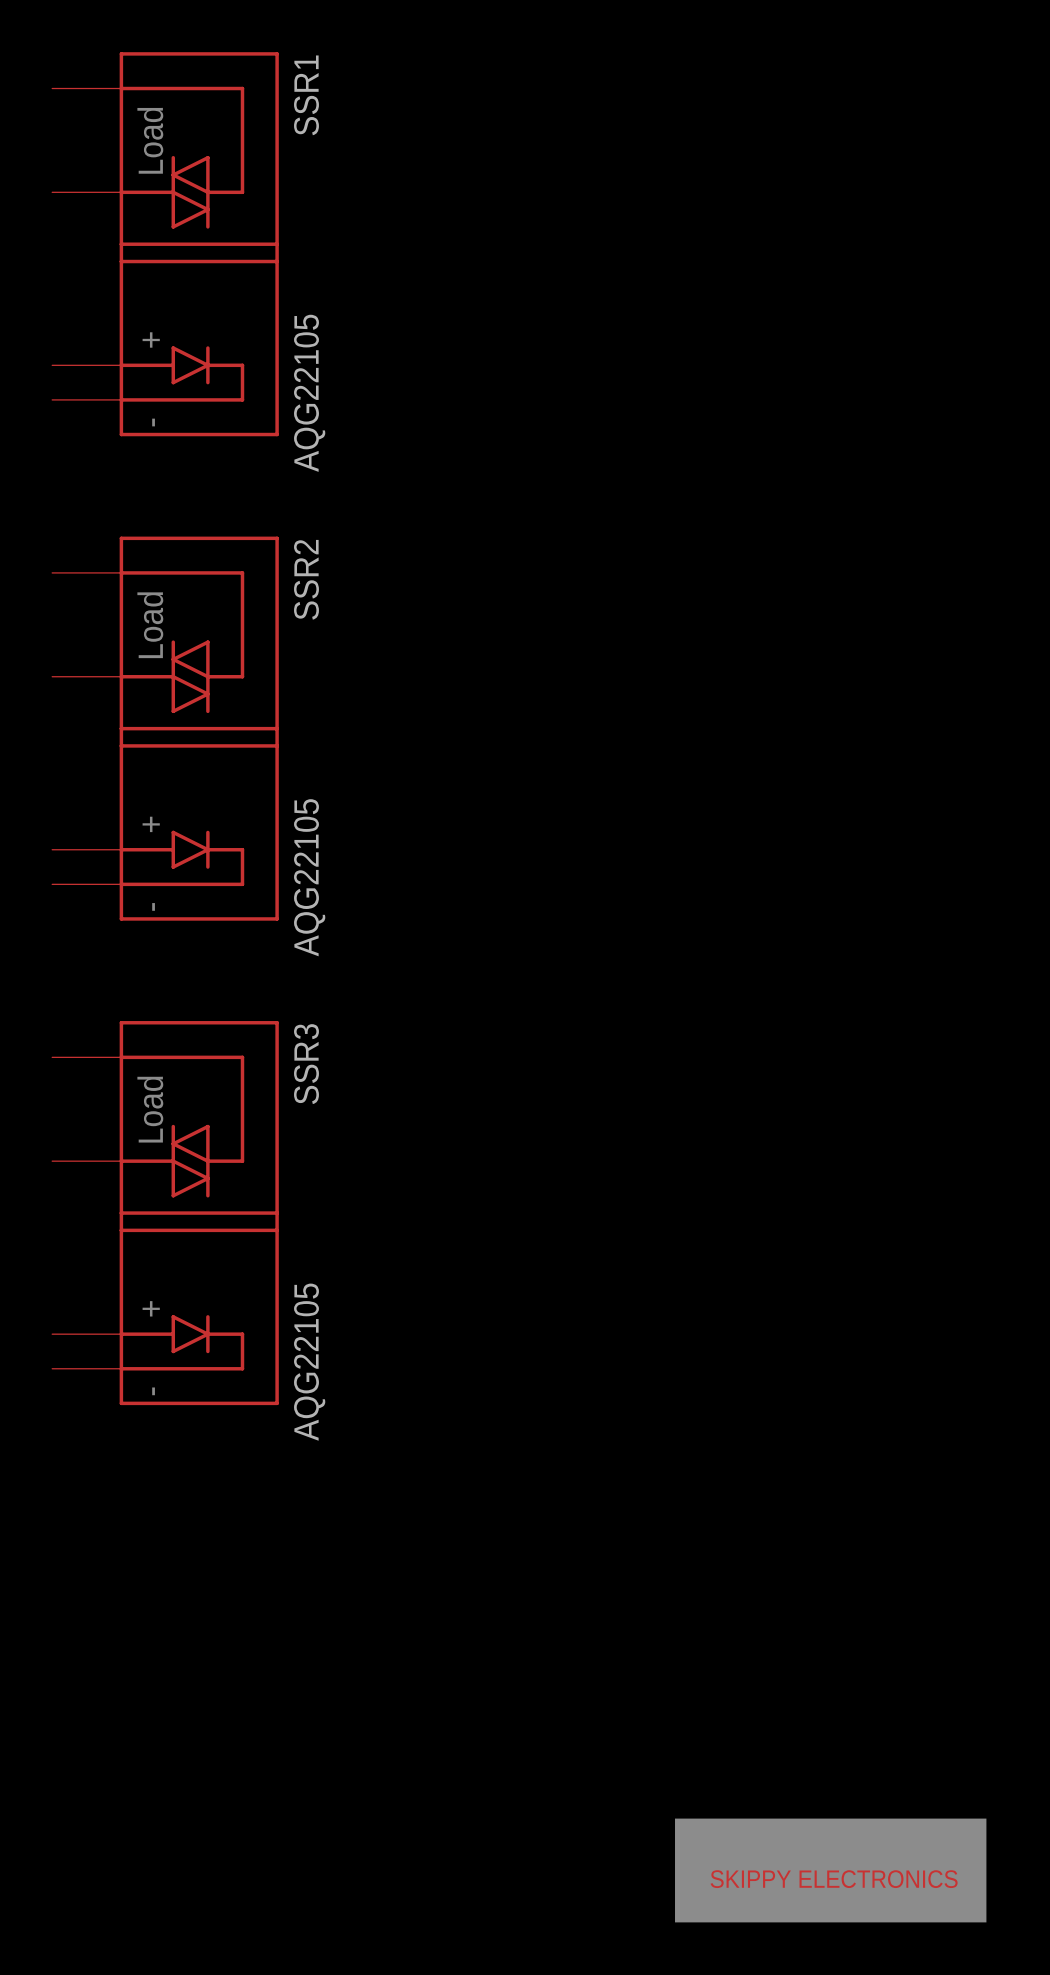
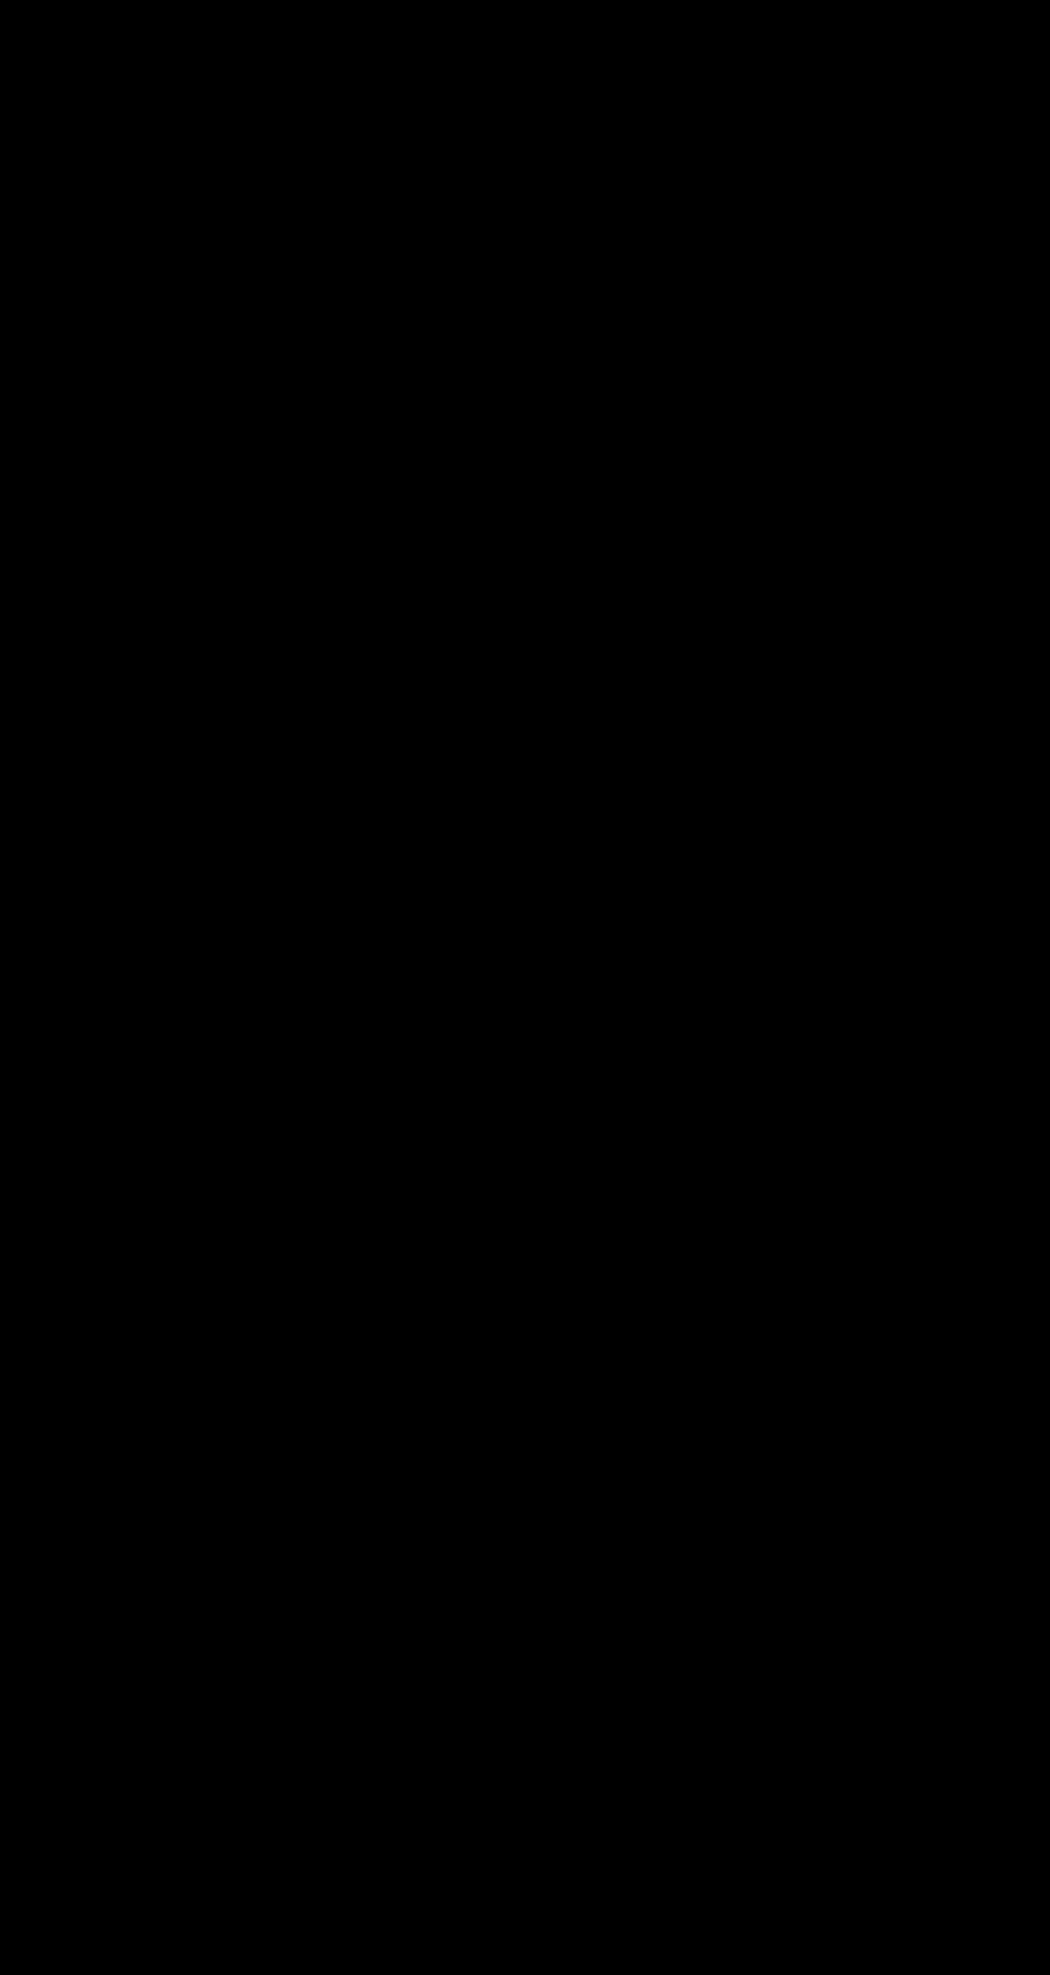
SSR1: AQG22105 (165, 244) -> none
SSR2: AQG22105 (165, 728) -> none
SSR3: AQG22105 (165, 1213) -> none
part: (830, 1870) -> none

